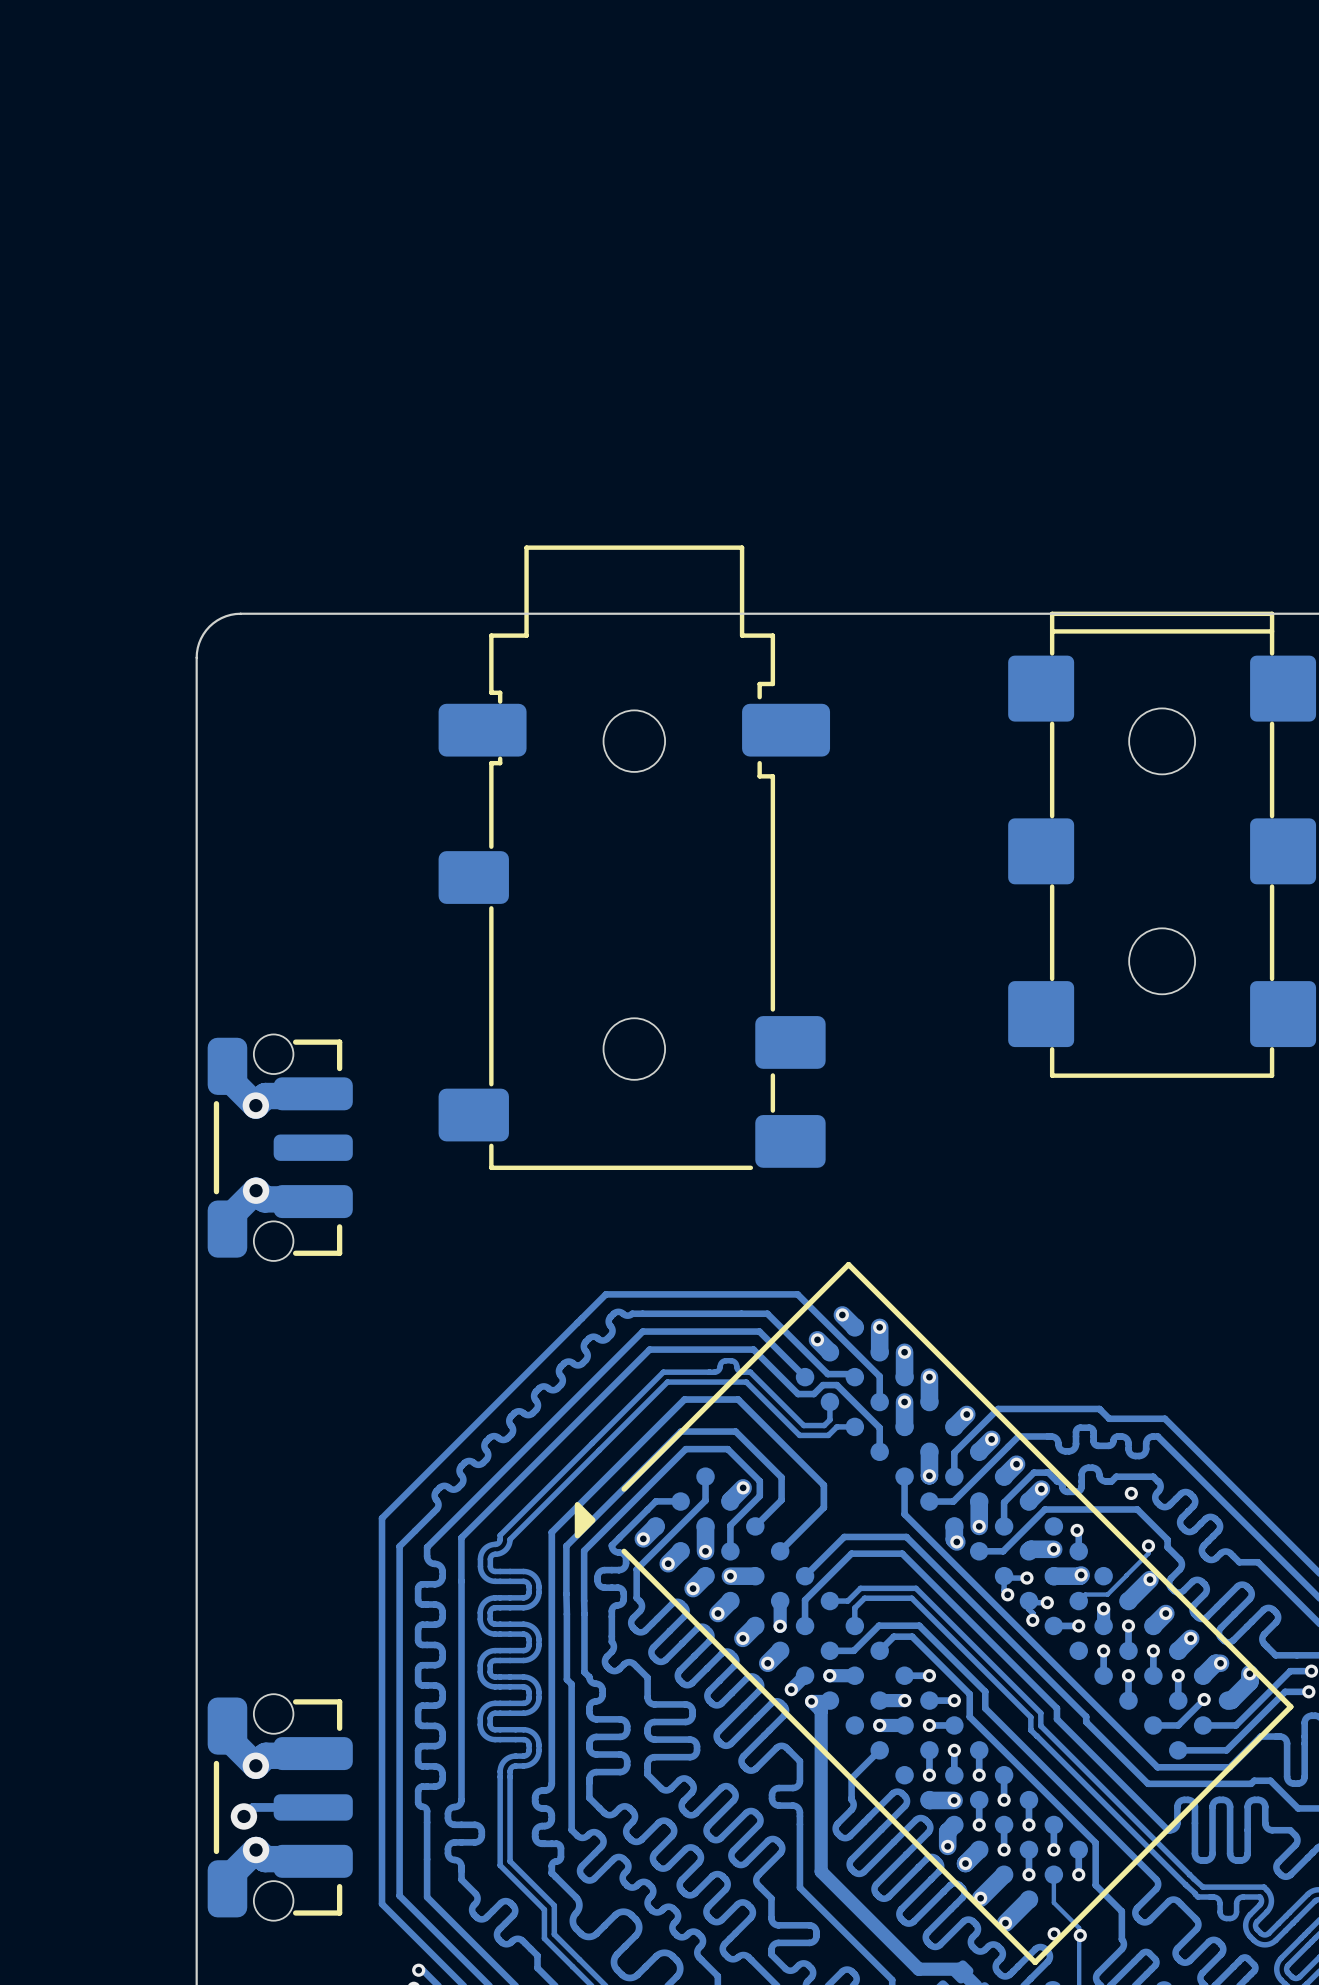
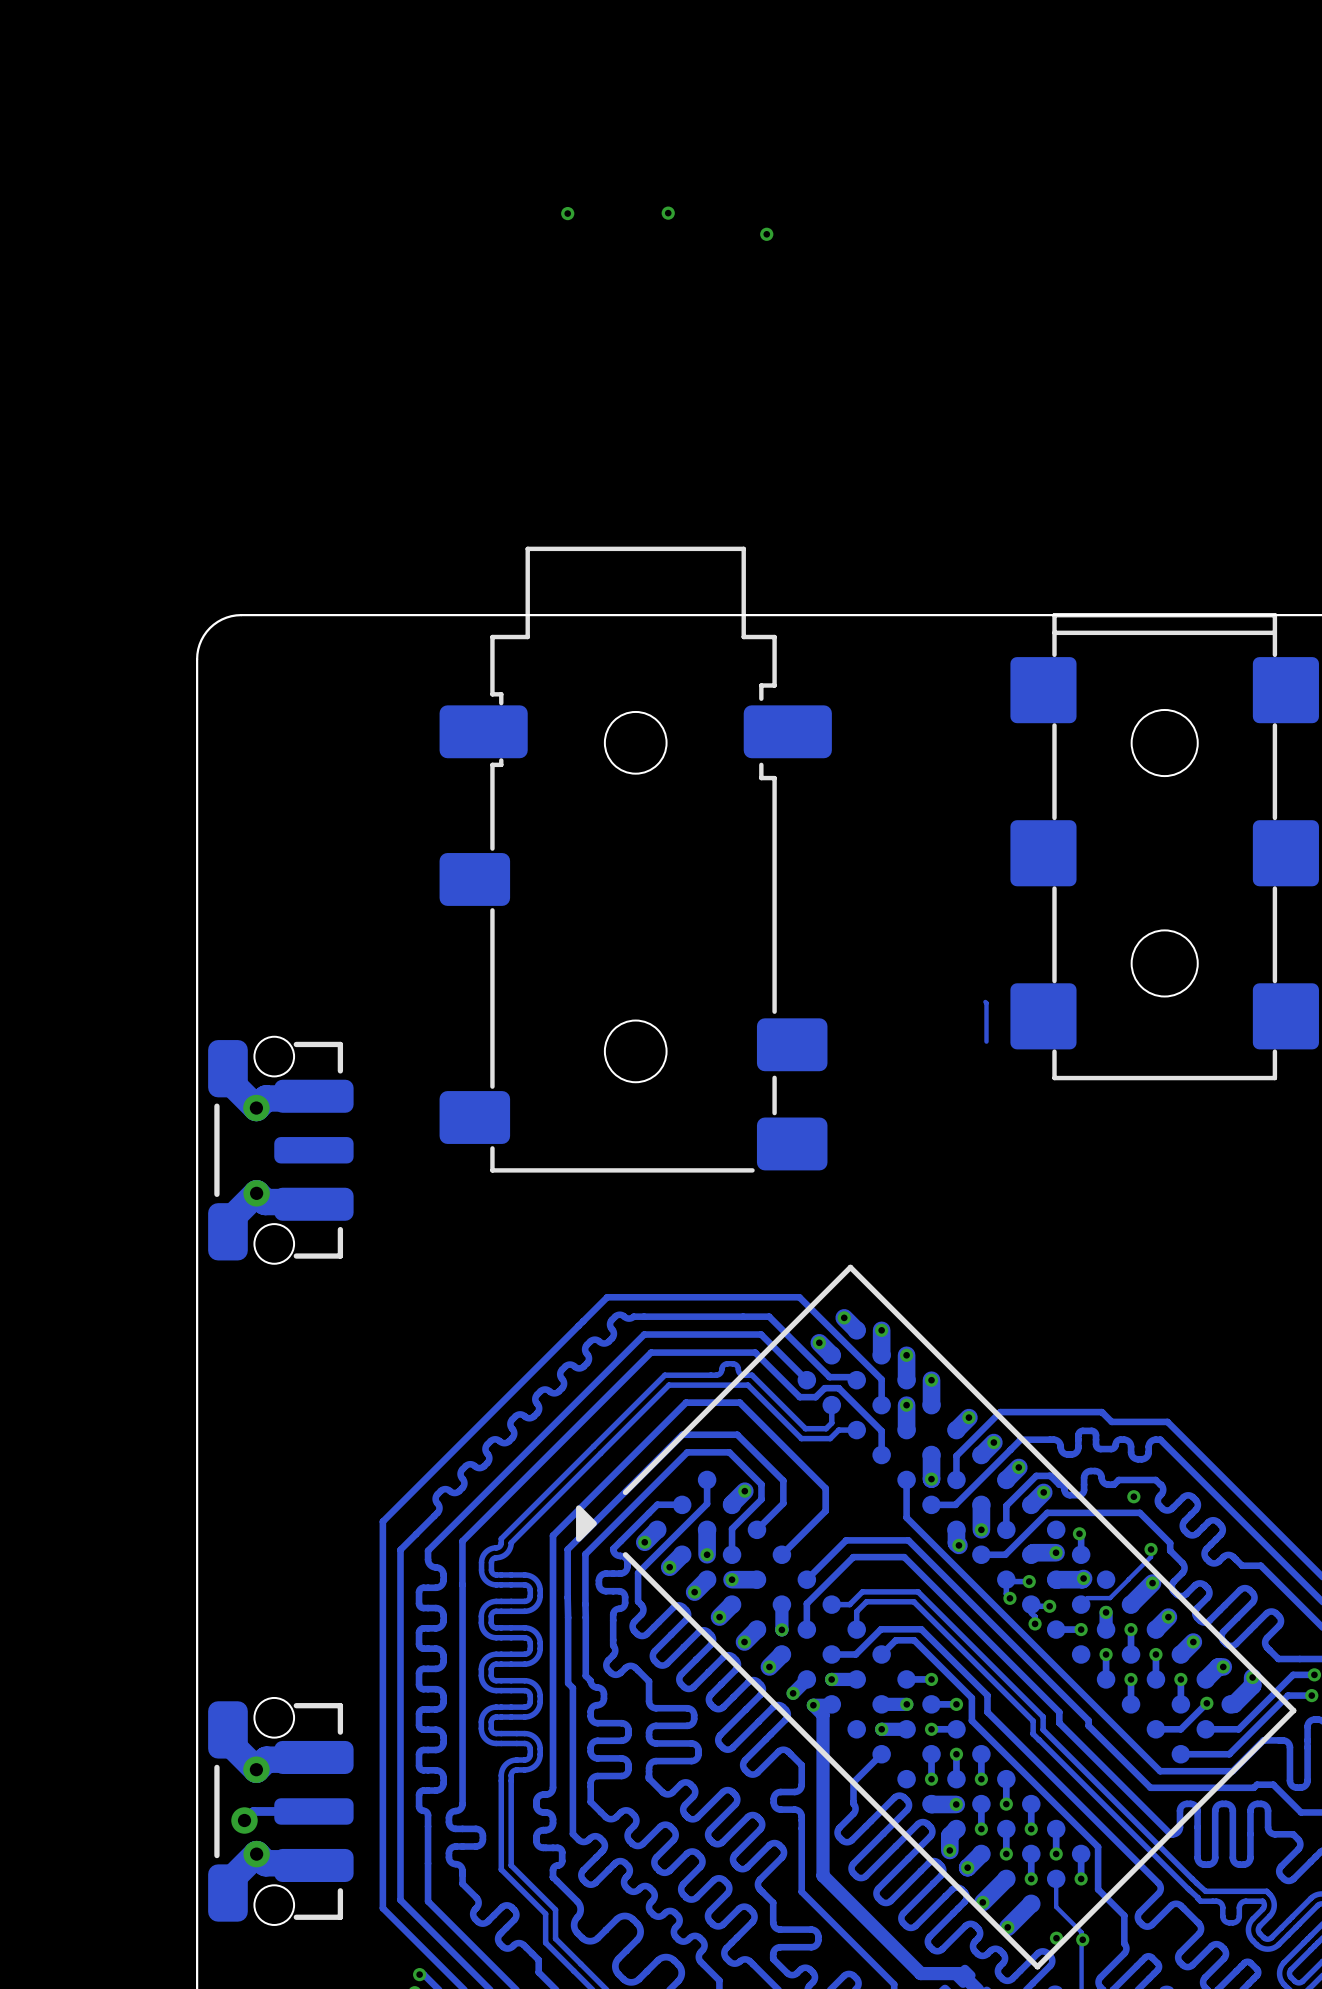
via: none -> (668, 213)
via: none -> (567, 213)
via: none -> (766, 234)
track: none -> (985, 1001) (986, 1041)

